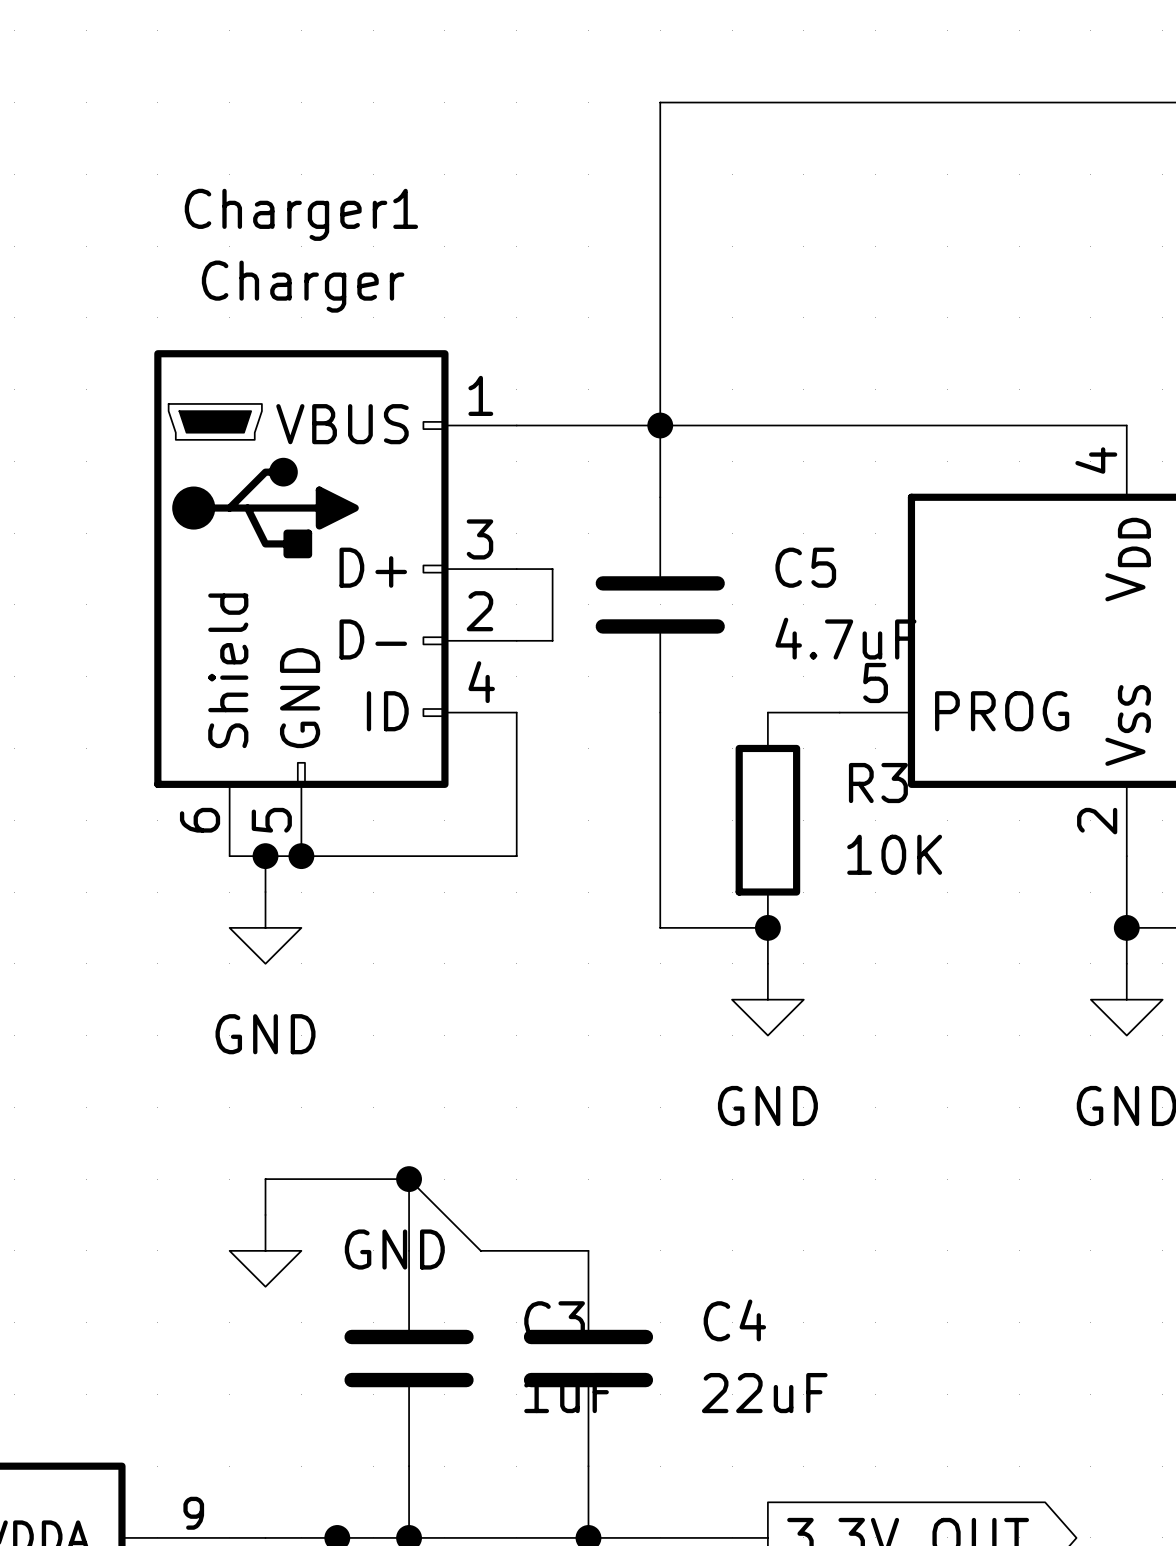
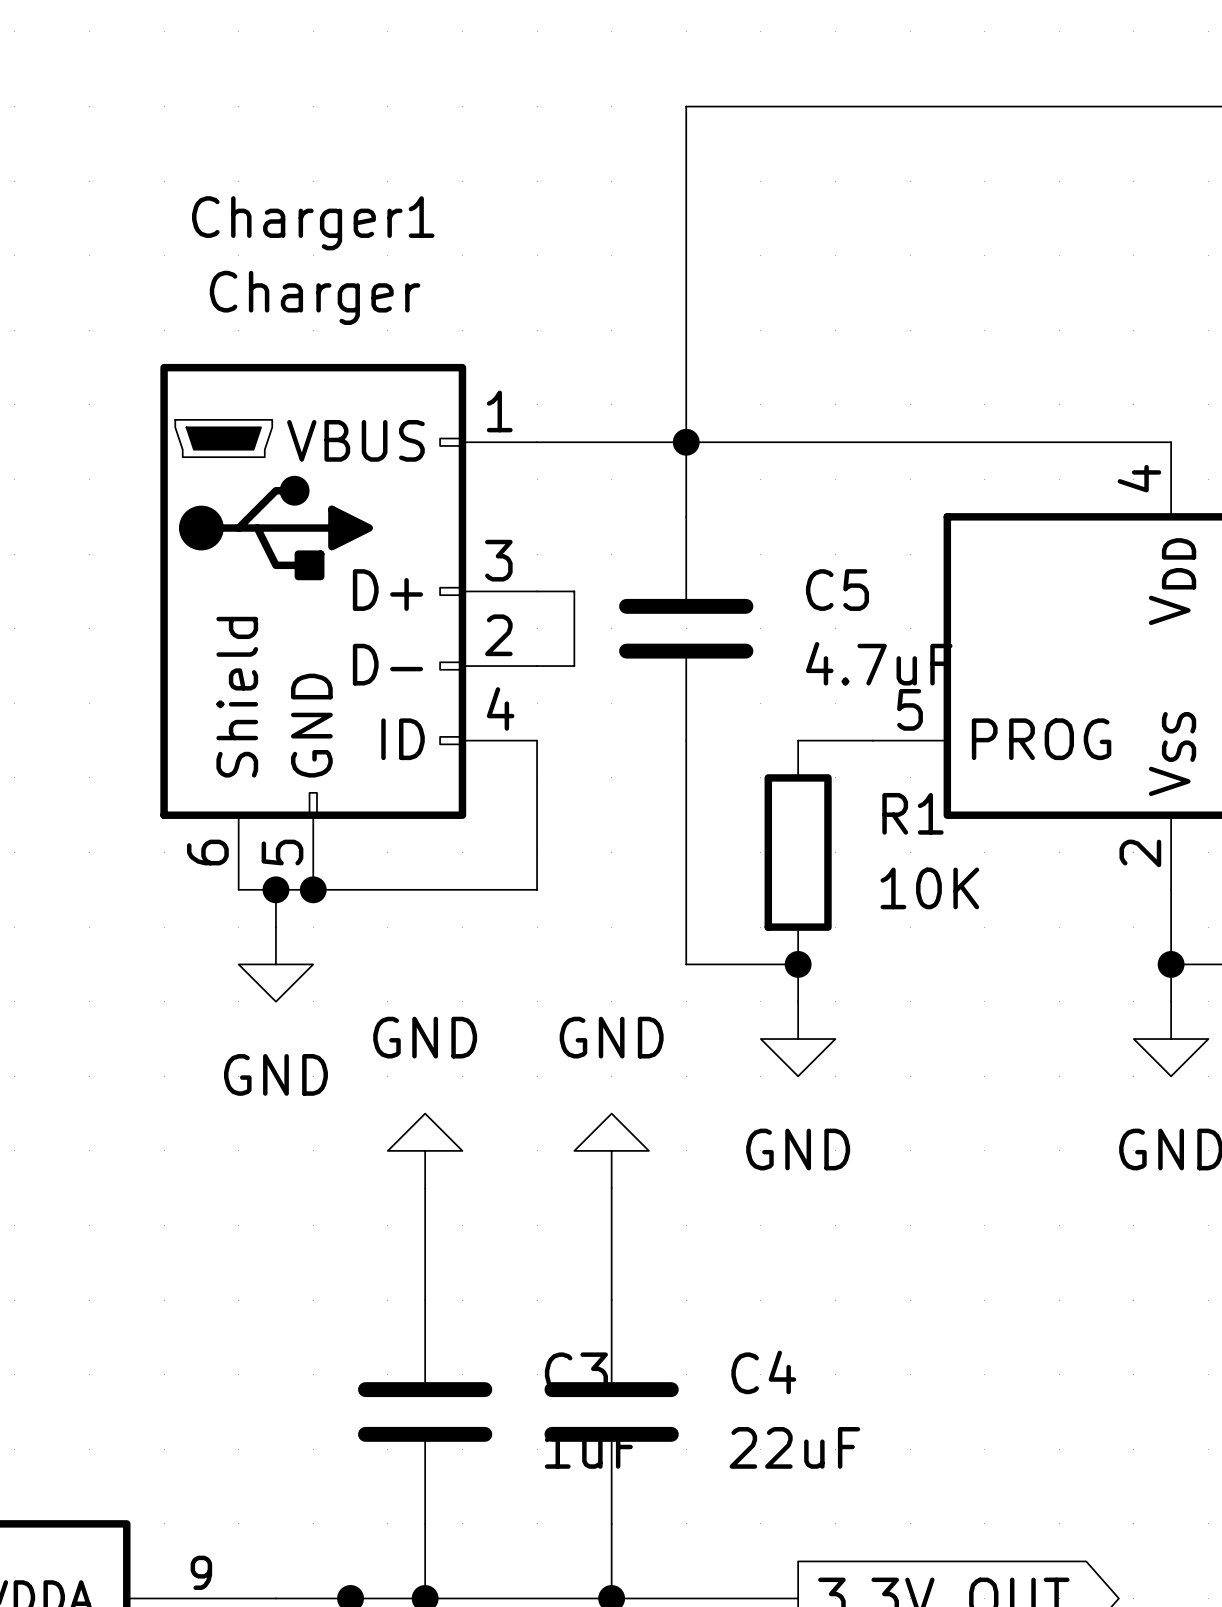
R3 name: R3 (878, 783) -> R1 (912, 813)
power symbol: none -> GND (425, 1150)
power symbol: none -> GND (611, 1150)
wire: none -> (425, 1188) (425, 1225)
junction: (409, 1179) -> none
wire: (265, 1214) (265, 1179) (409, 1179) (480, 1250) (588, 1250) -> (611, 1188) (611, 1300)
power symbol: GND (265, 1250) -> none

